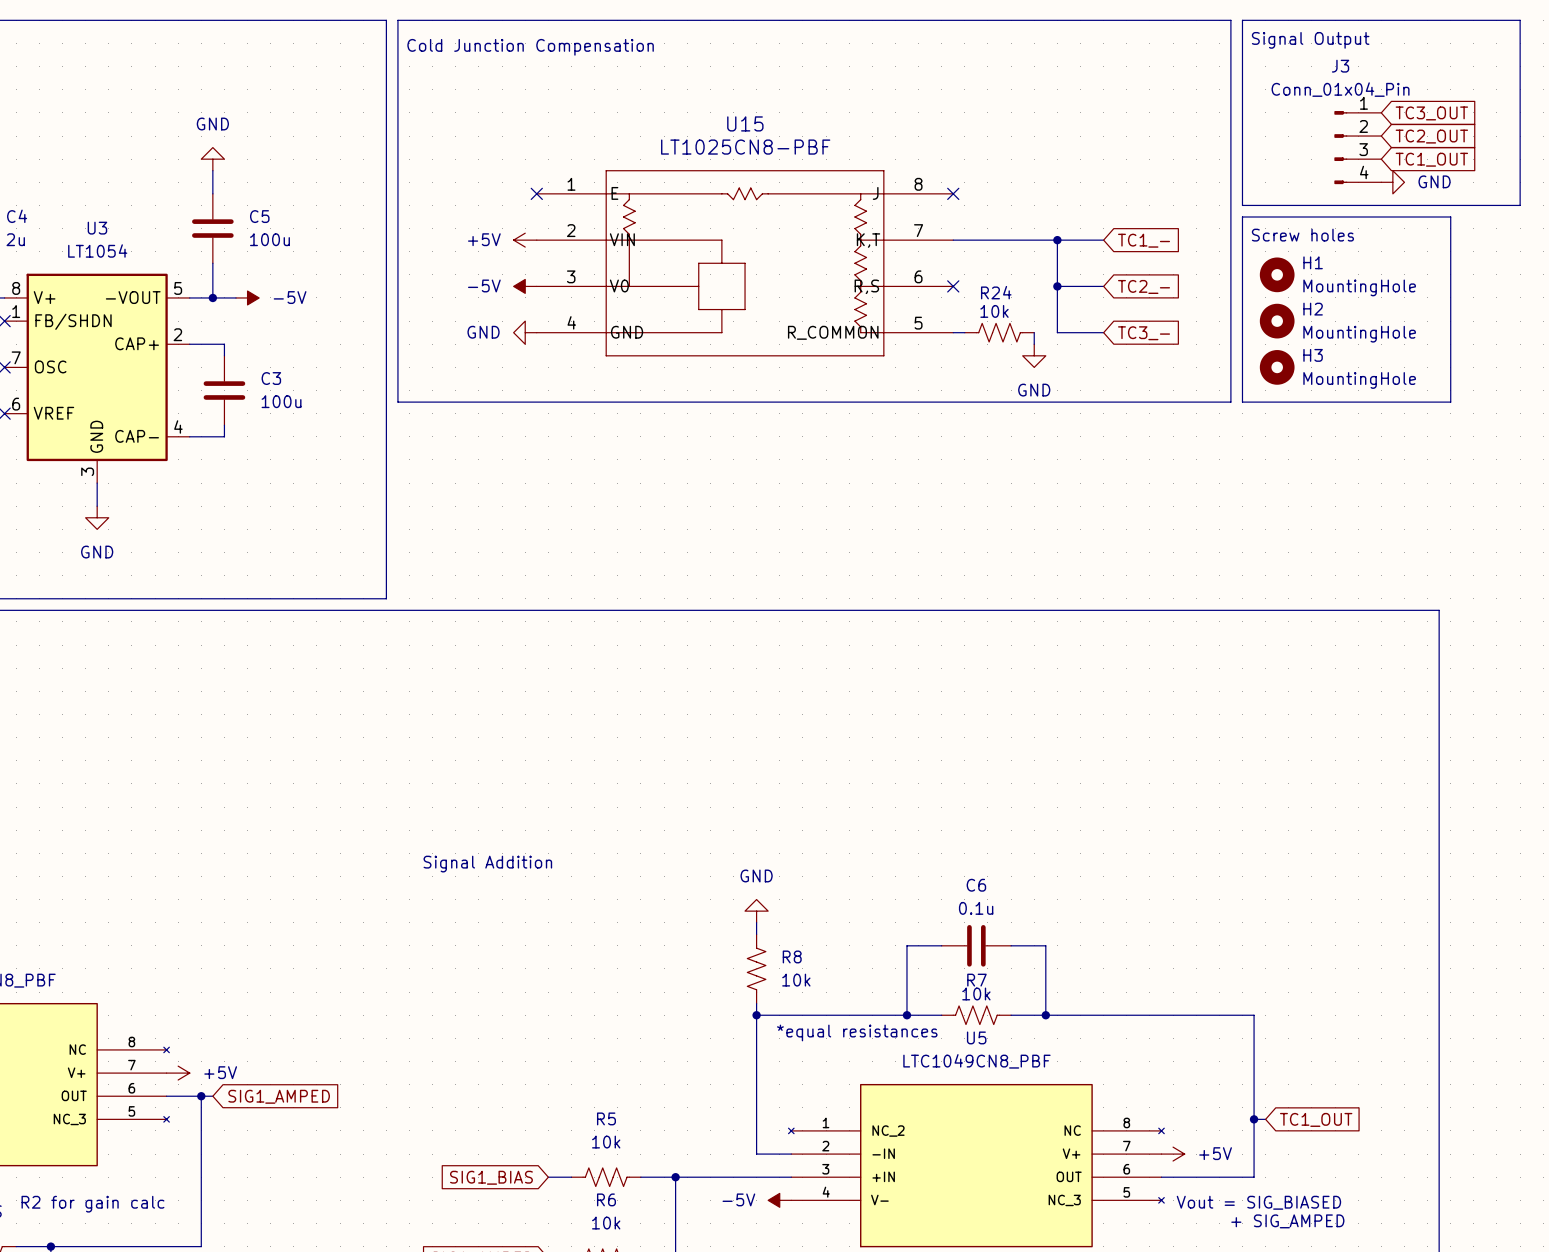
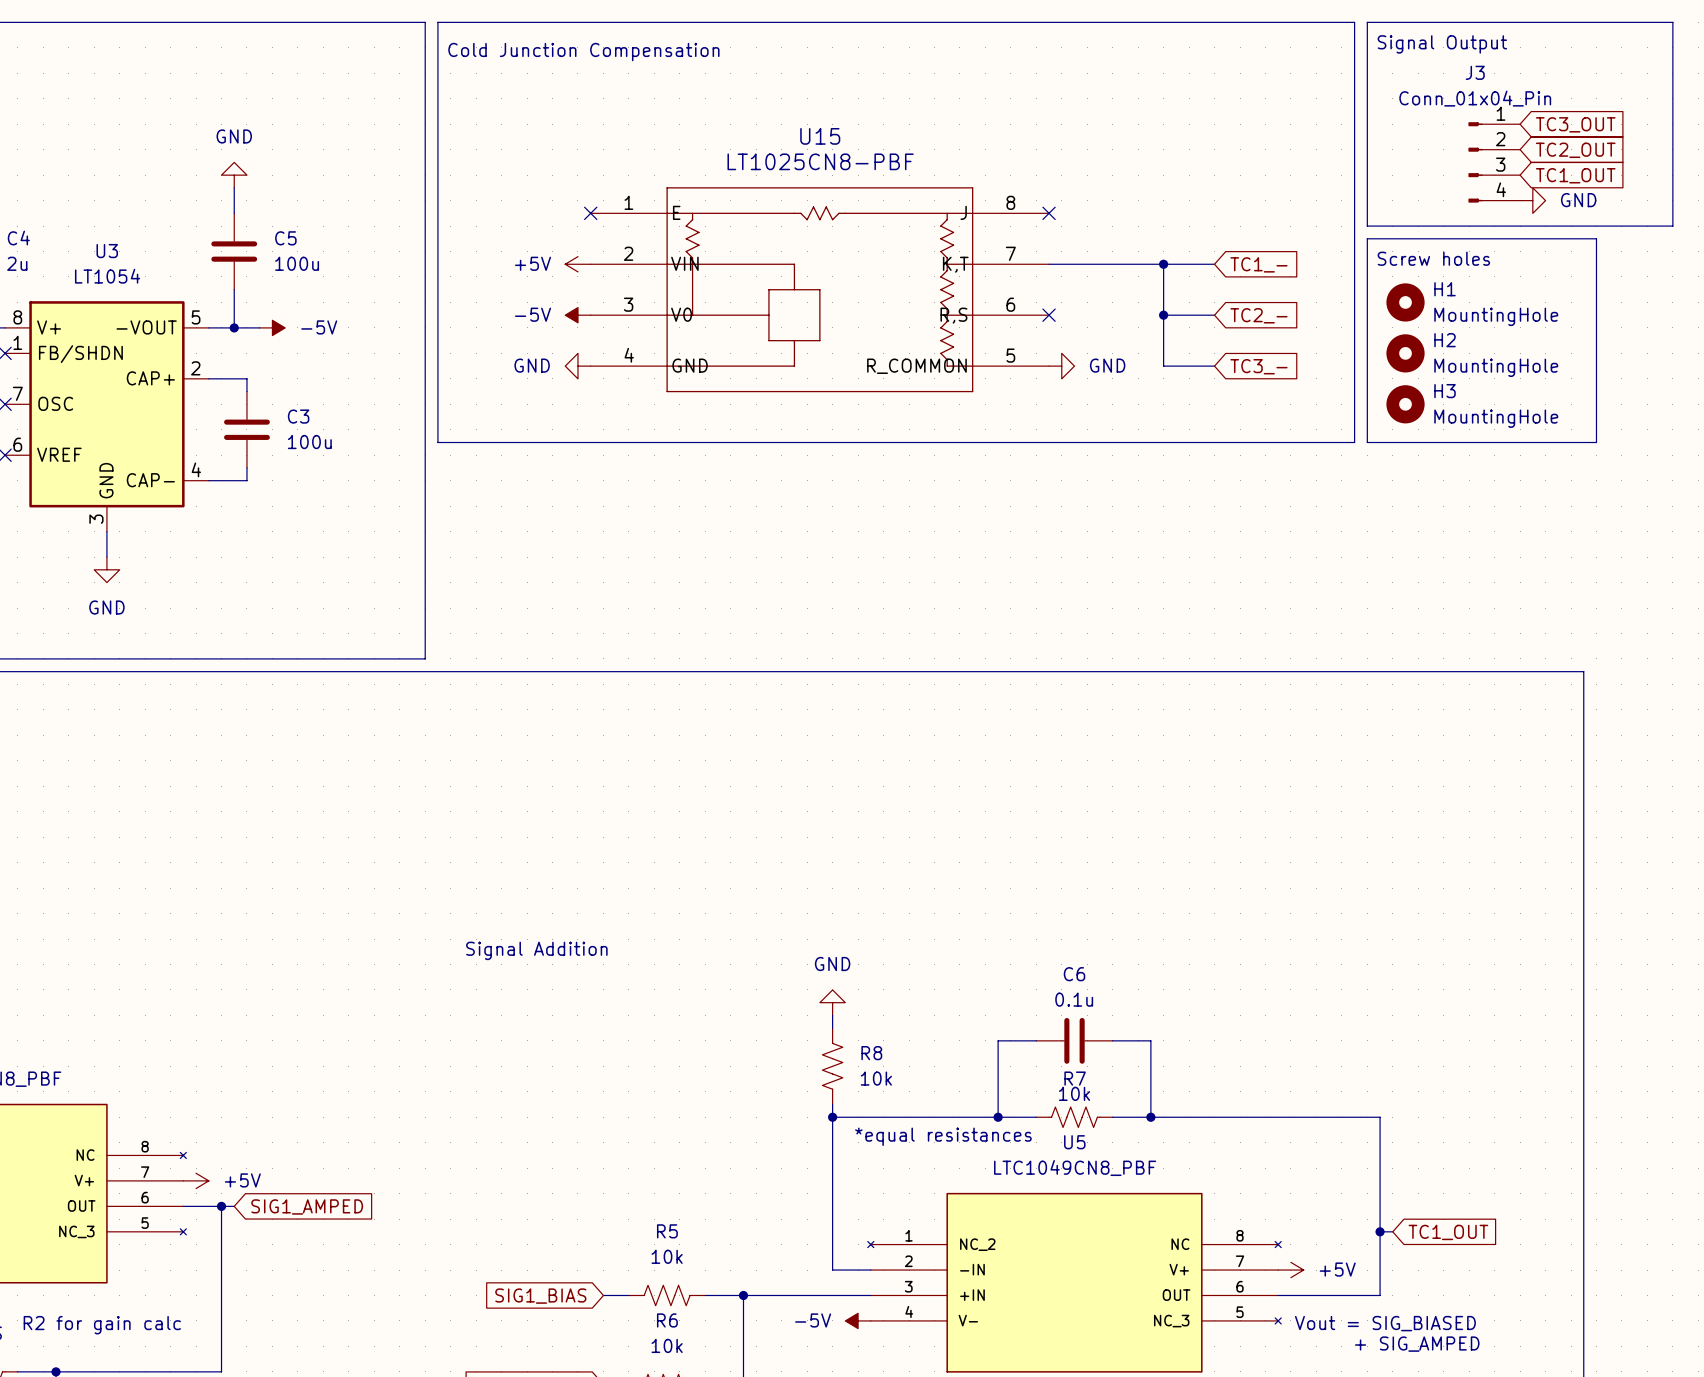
R24: 10k (999, 332) -> none
wire: (1034, 332) (1034, 344) -> none
power symbol rotation: 0° (1034, 355) -> 90° counterclockwise (1061, 366)
power symbol position: GND (1034, 355) -> GND (1061, 366)

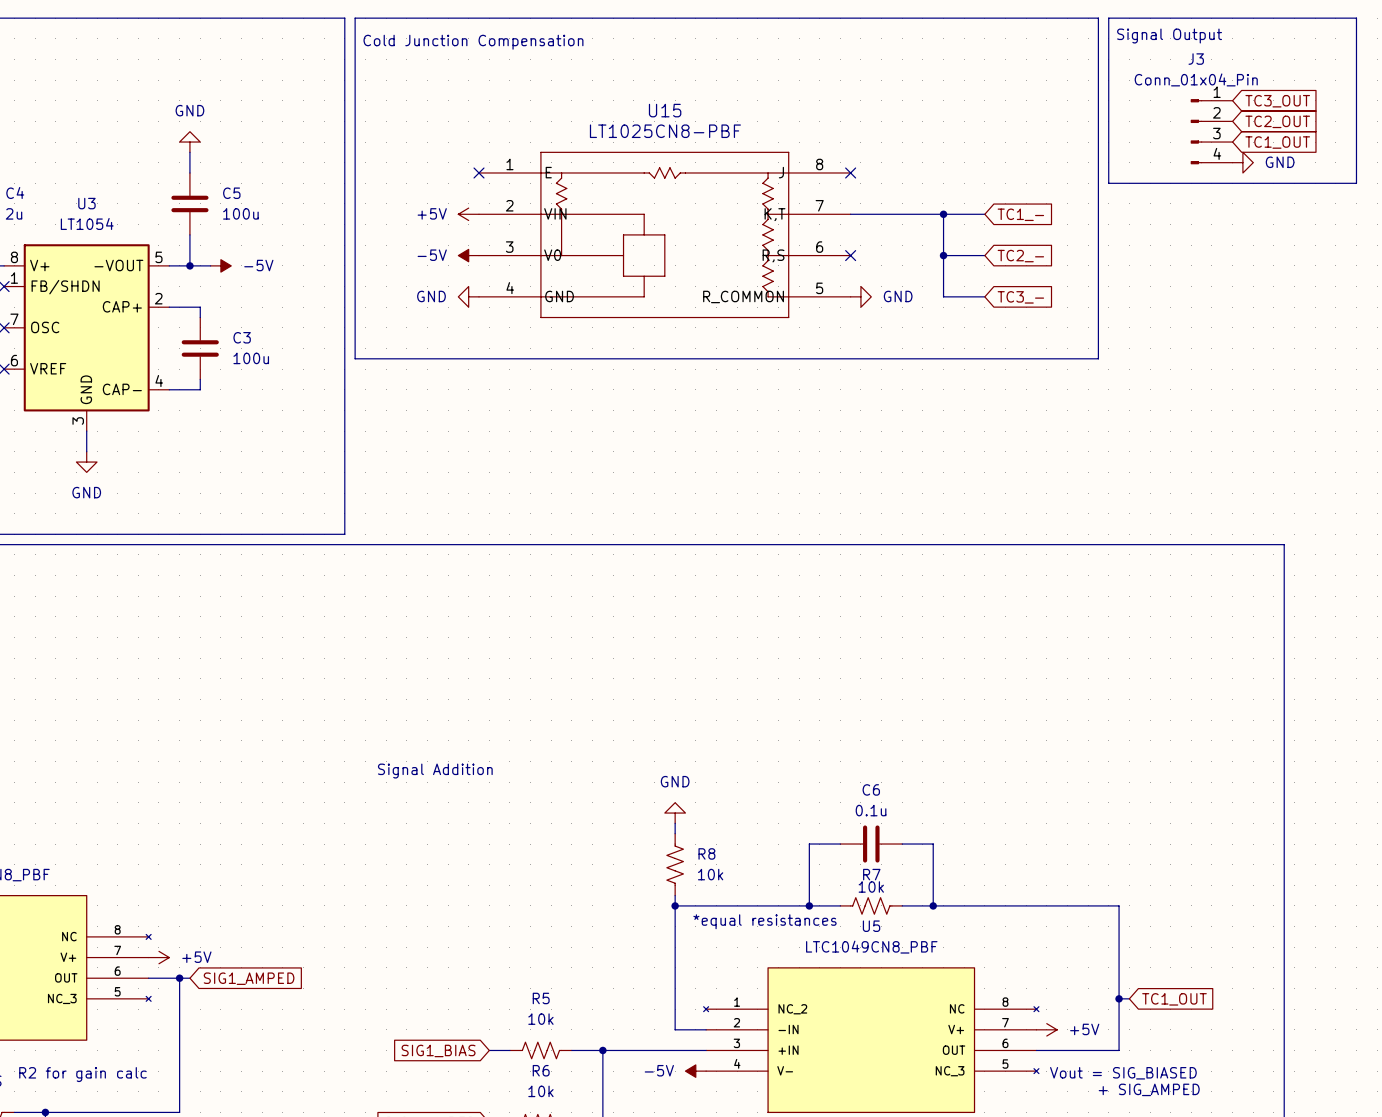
line: (1367, 238) (1596, 238) (1596, 442) (1367, 442) (1367, 238) -> none
text: Screw holes (1433, 258) -> none
H1: MountingHole (1405, 302) -> none
H2: MountingHole (1405, 353) -> none
H3: MountingHole (1405, 404) -> none

